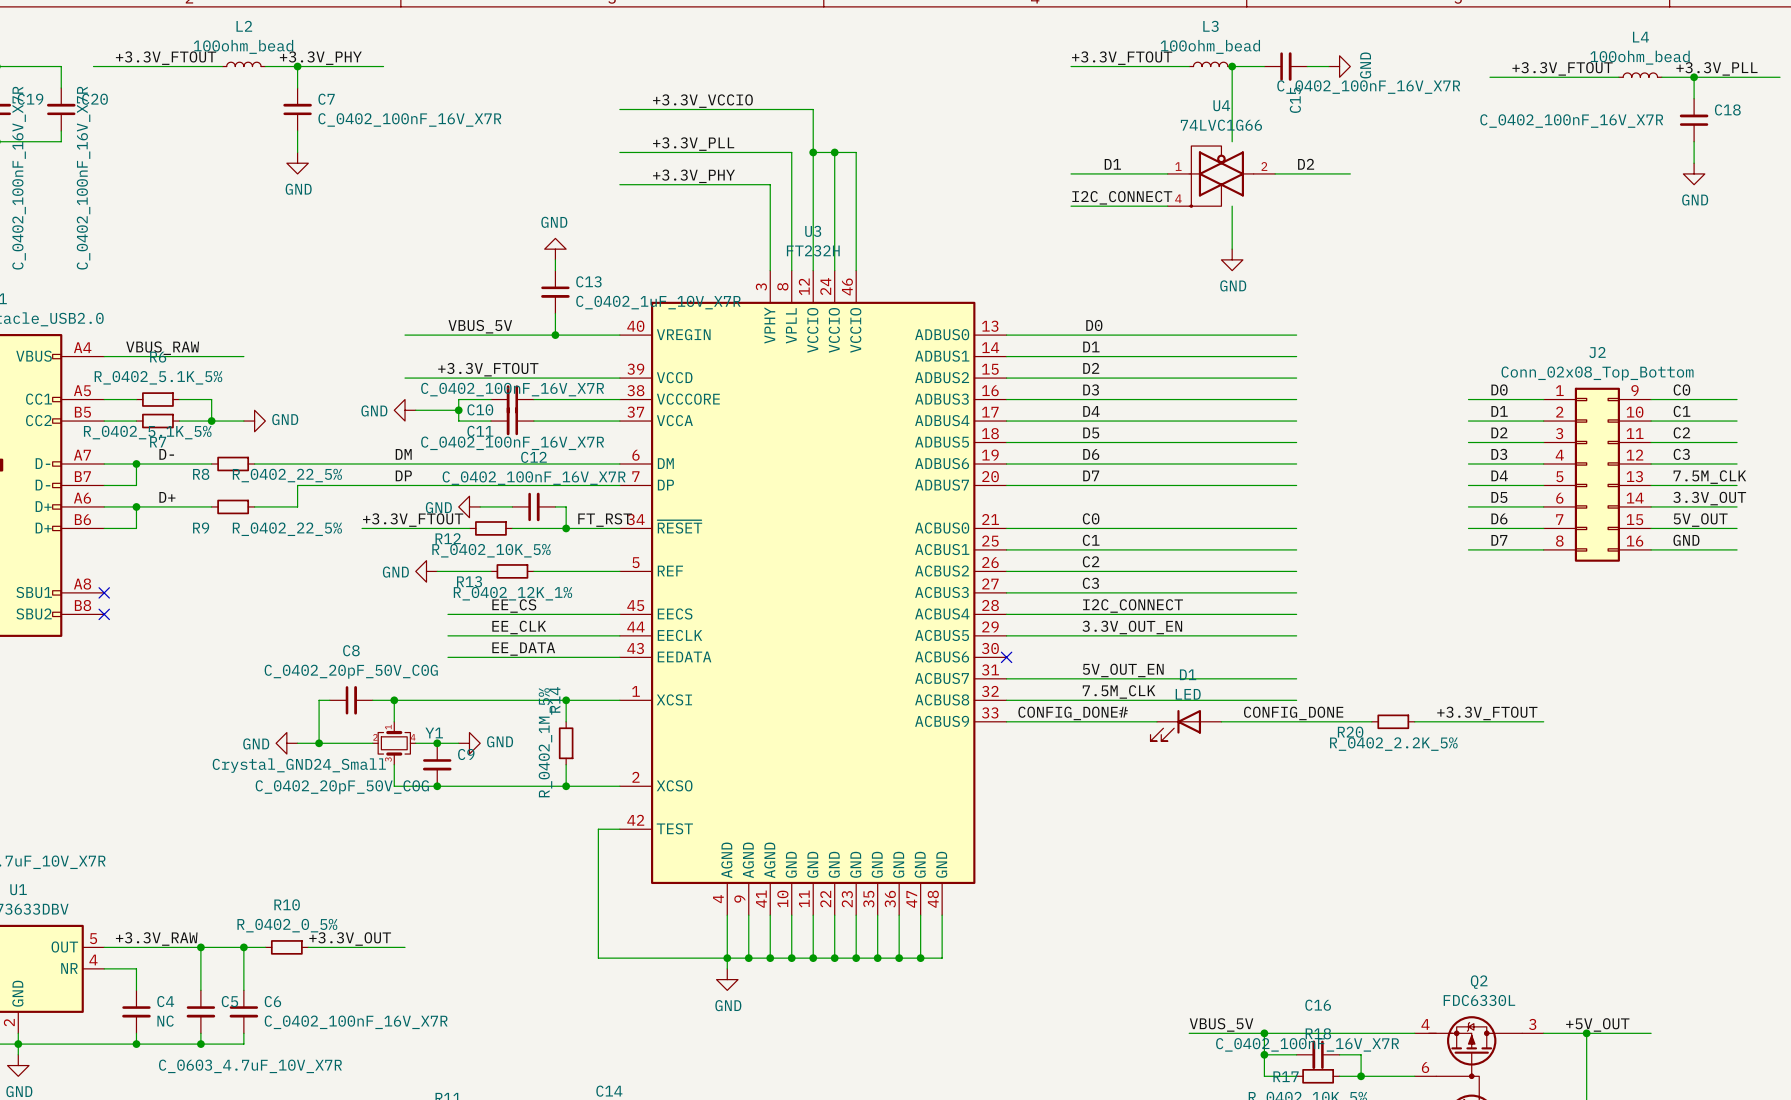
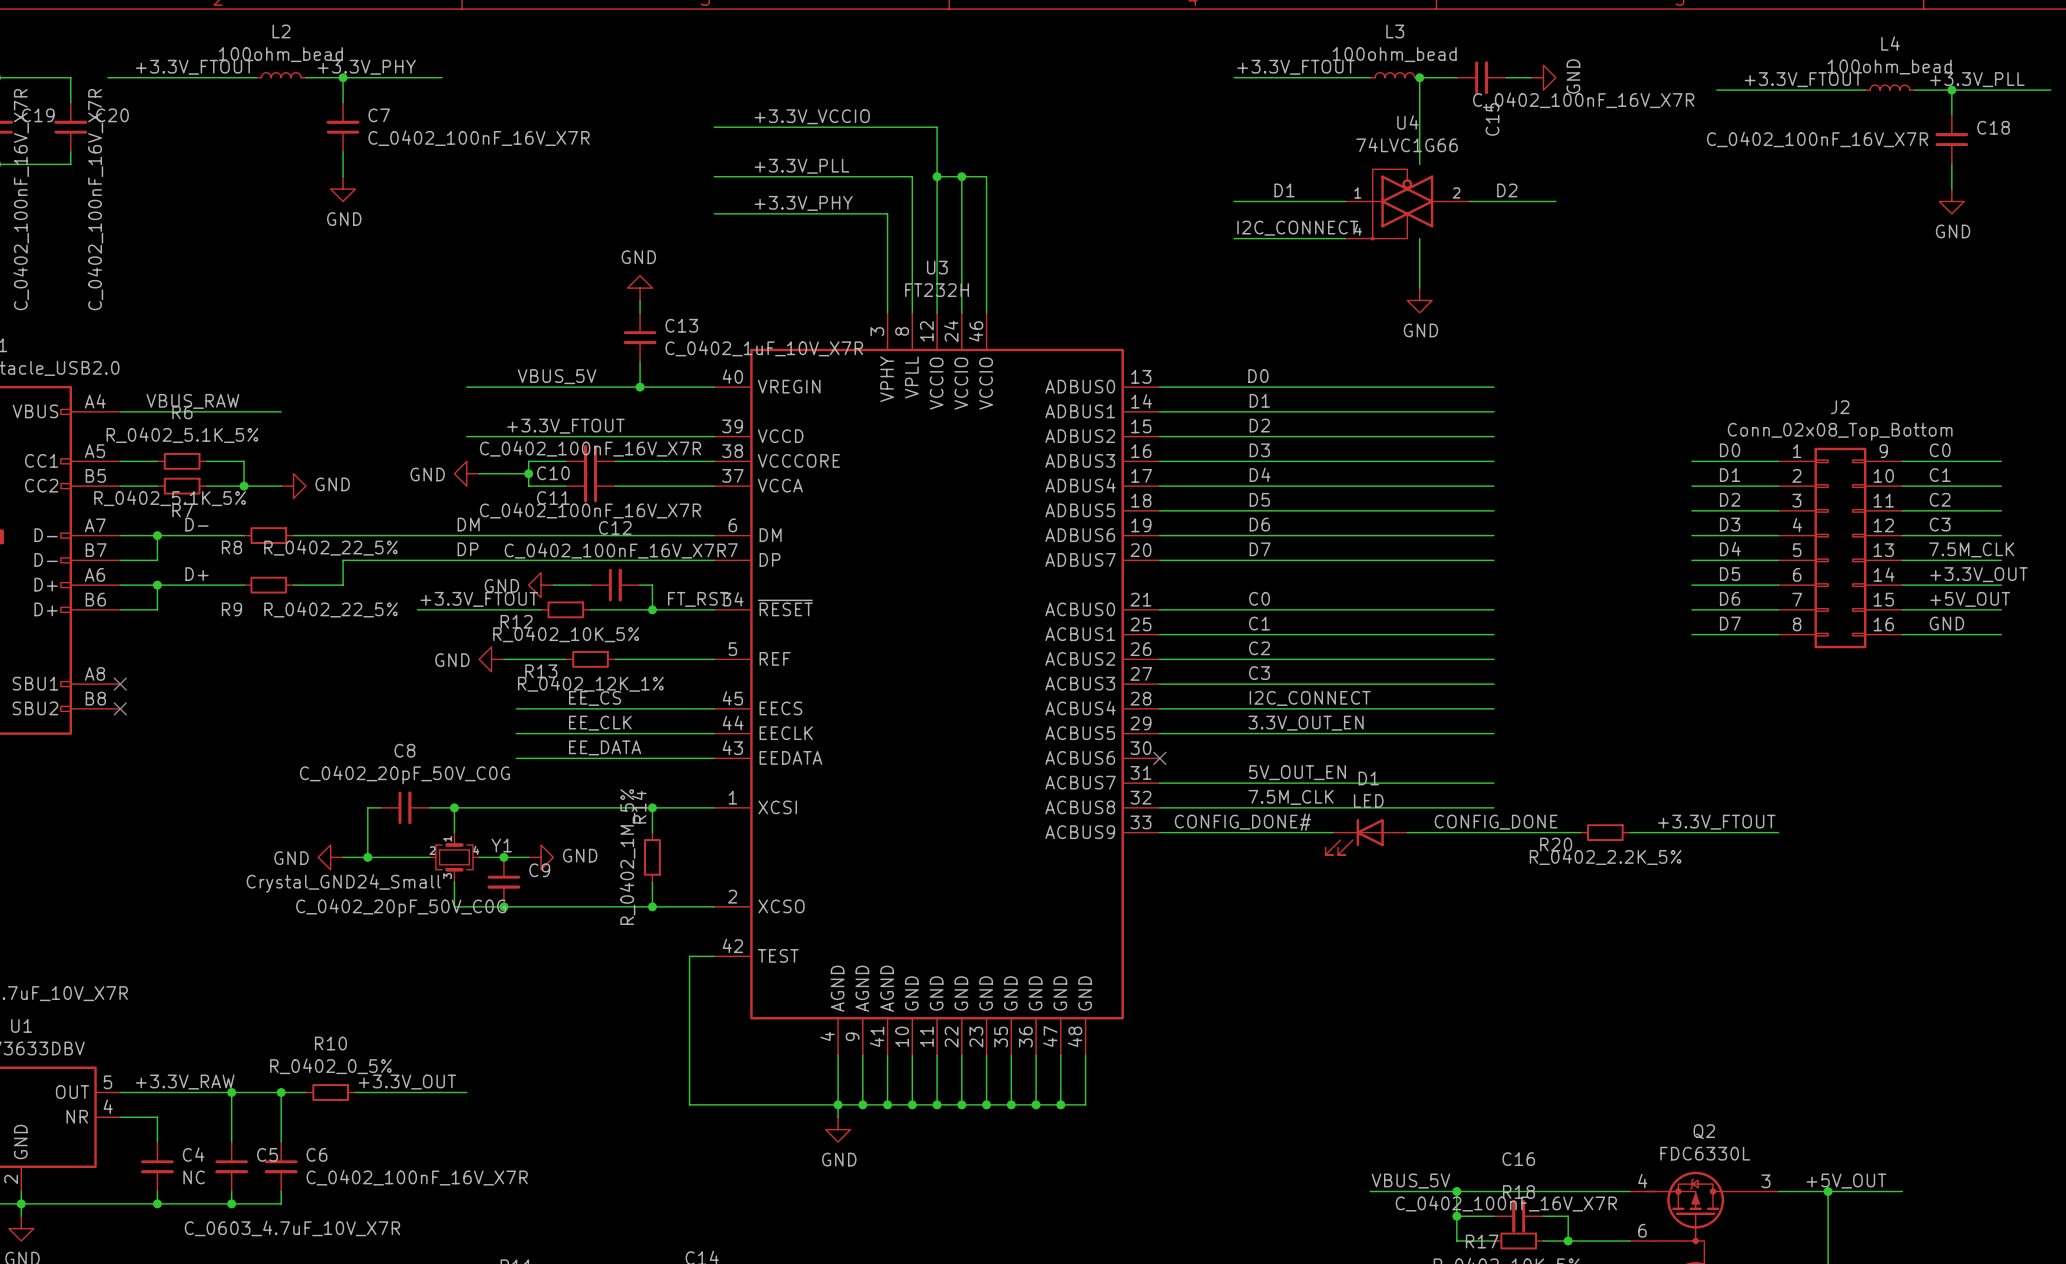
label: 3.3V_OUT (1709, 498) -> +3.3V_OUT (1979, 574)
label: 5V_OUT (1700, 520) -> +5V_OUT (1970, 599)

